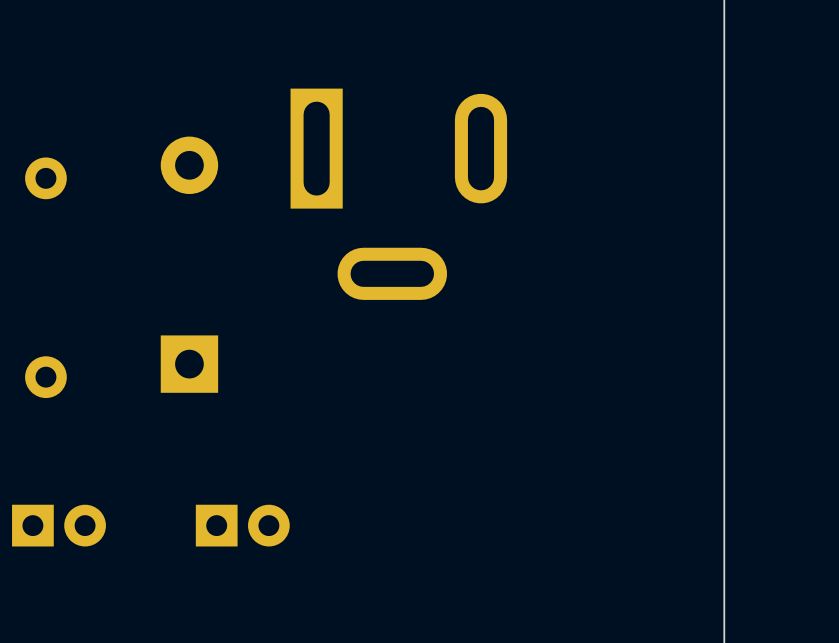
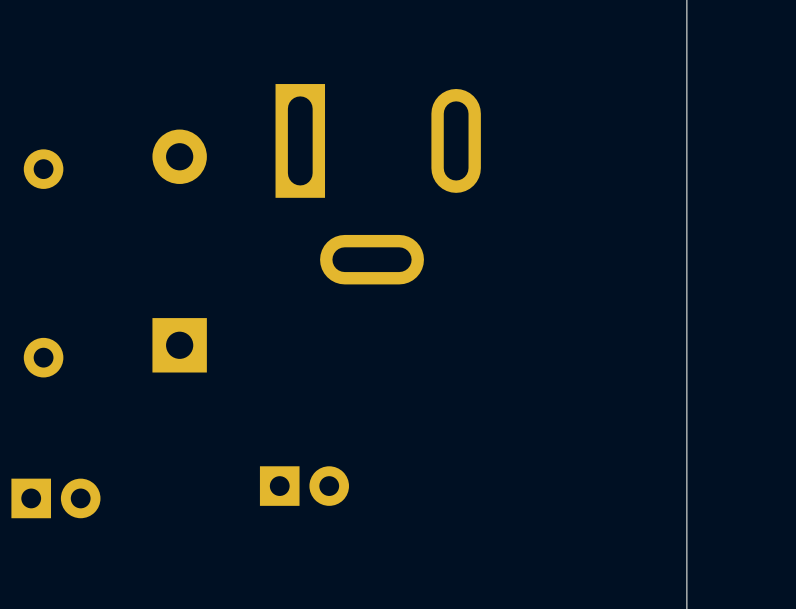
part position: (242, 525) -> (304, 486)

